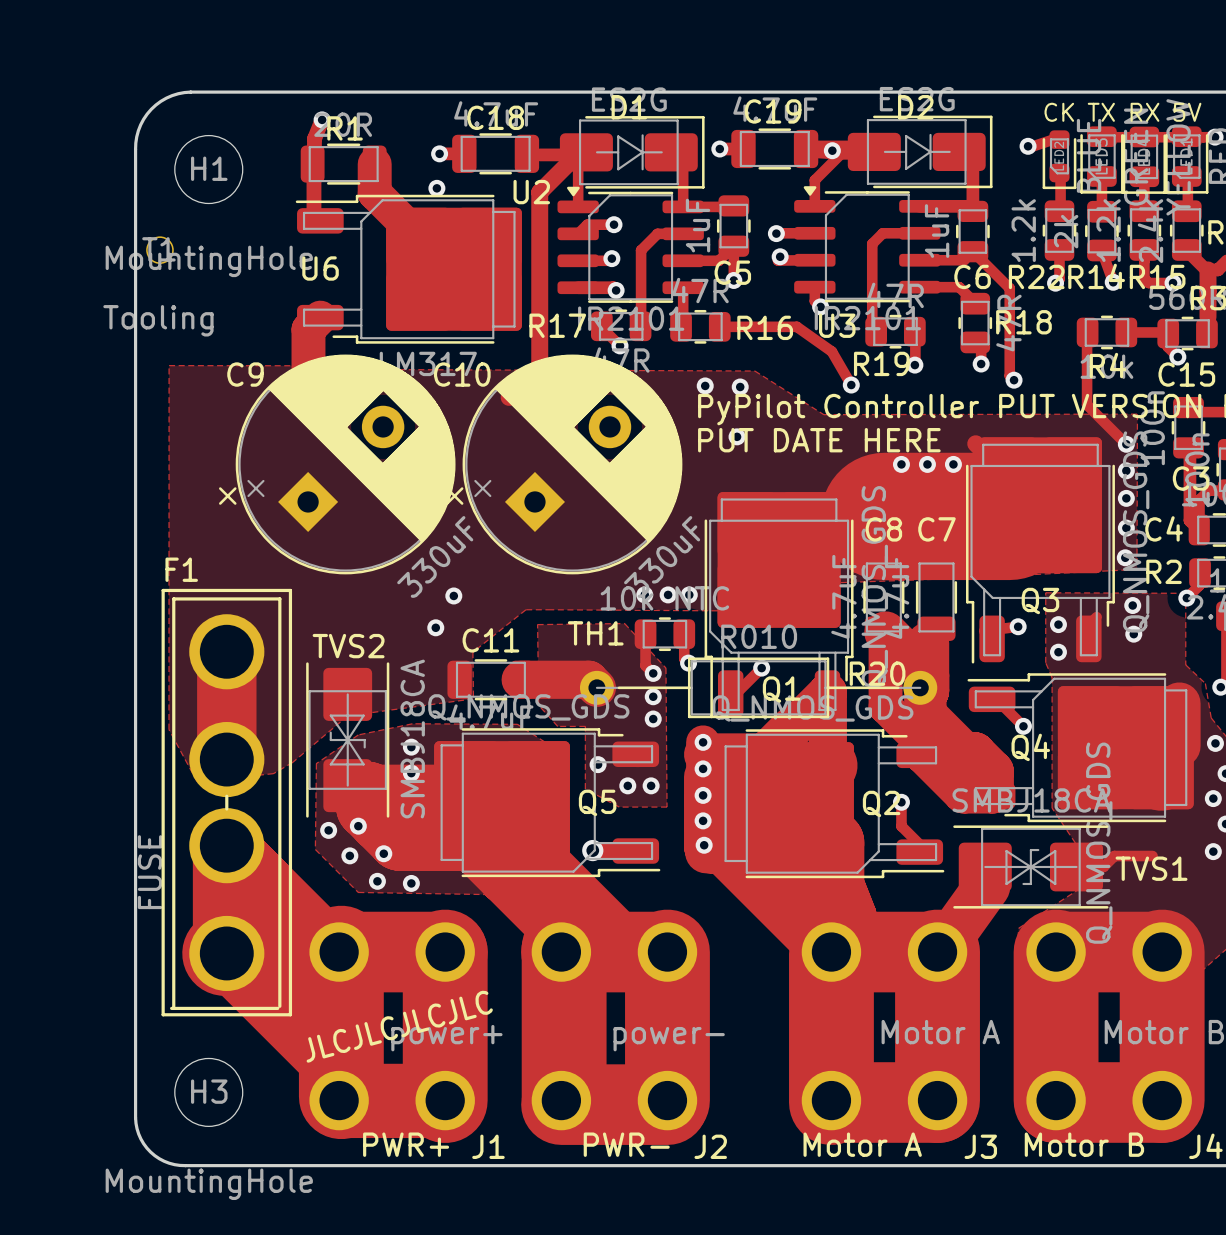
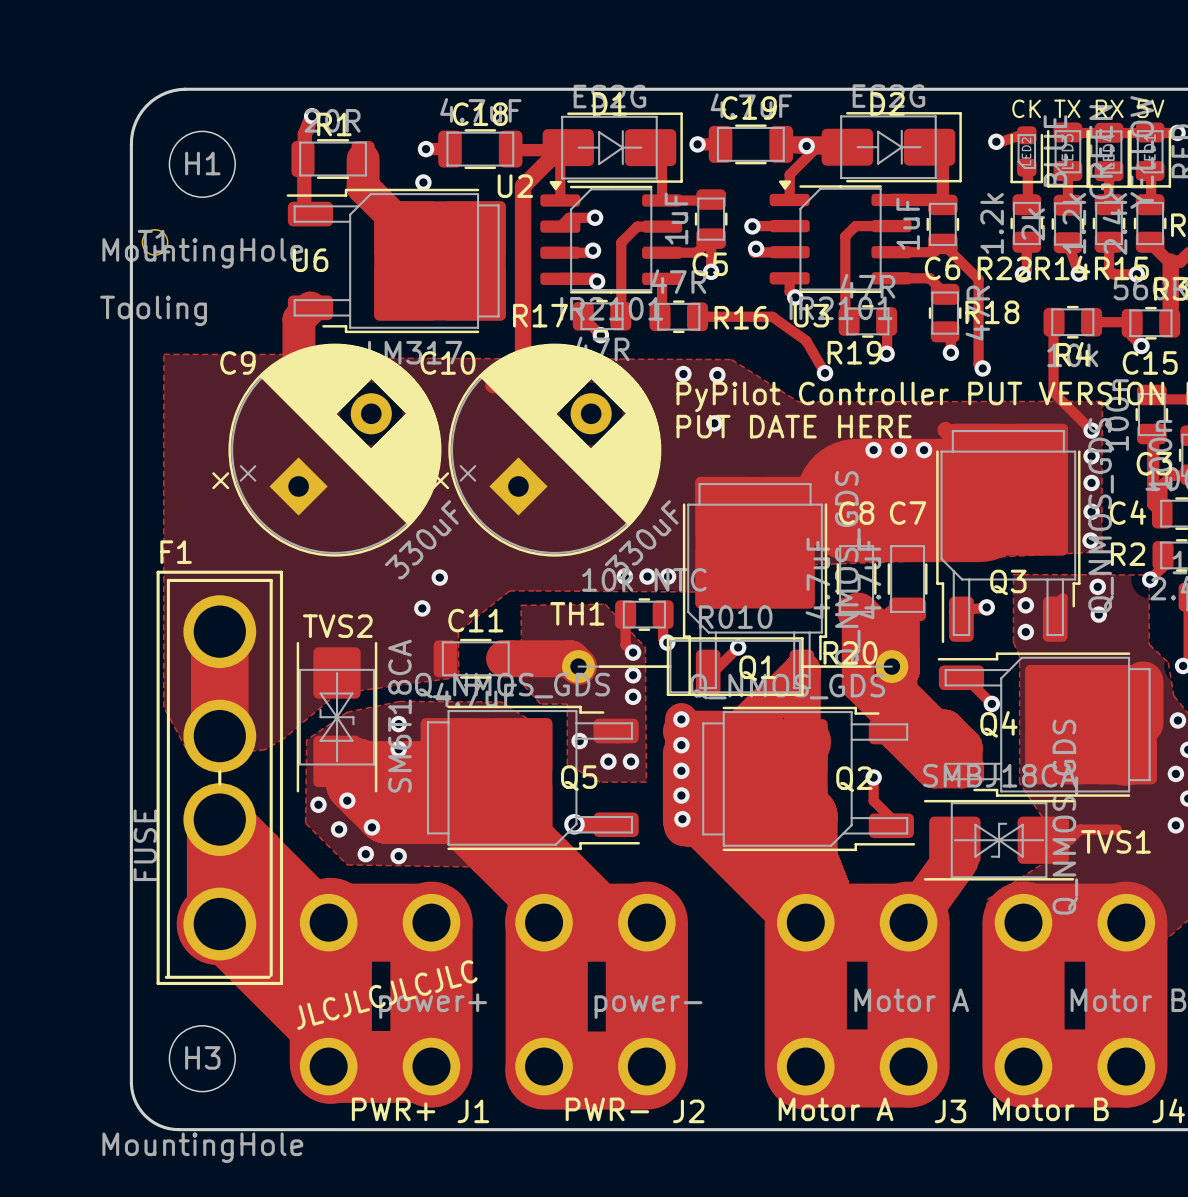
TVS2 value: SMBJ18CA (412, 739) -> SM6T18CA (399, 716)

